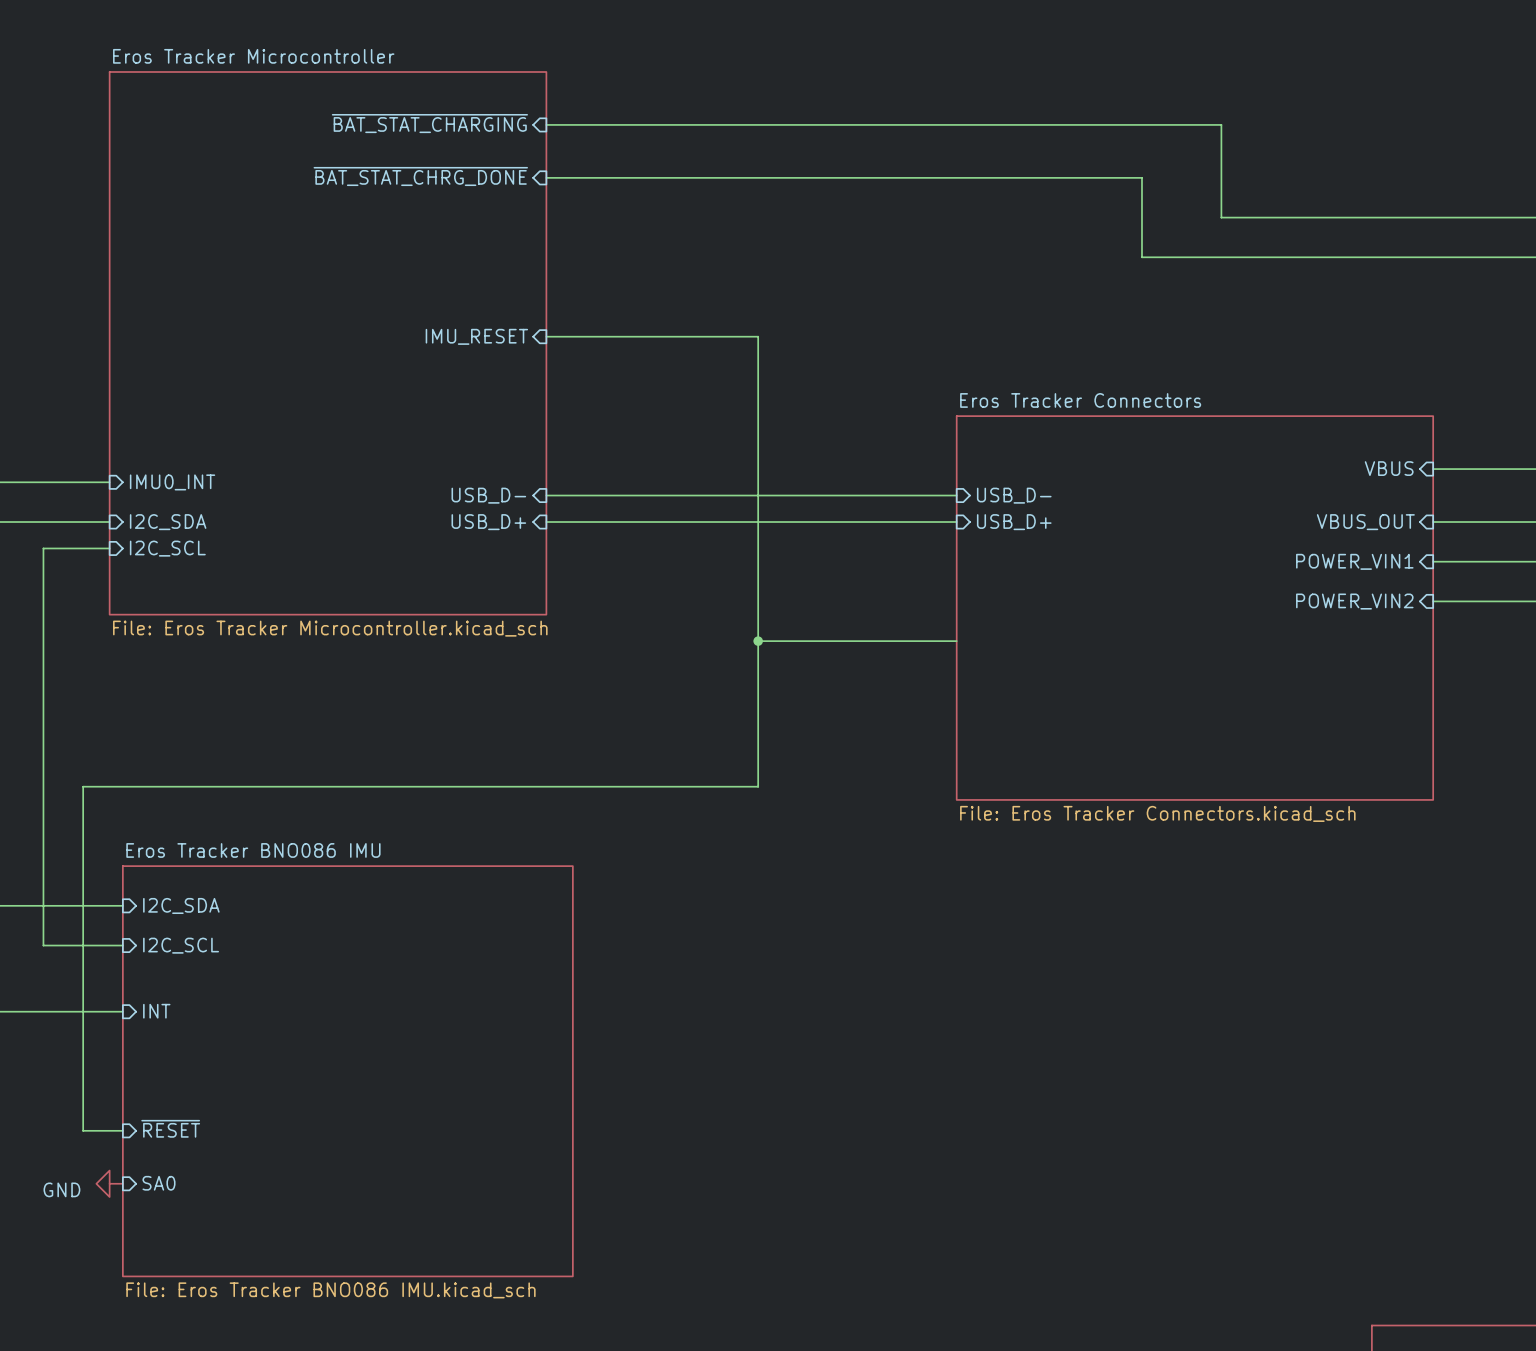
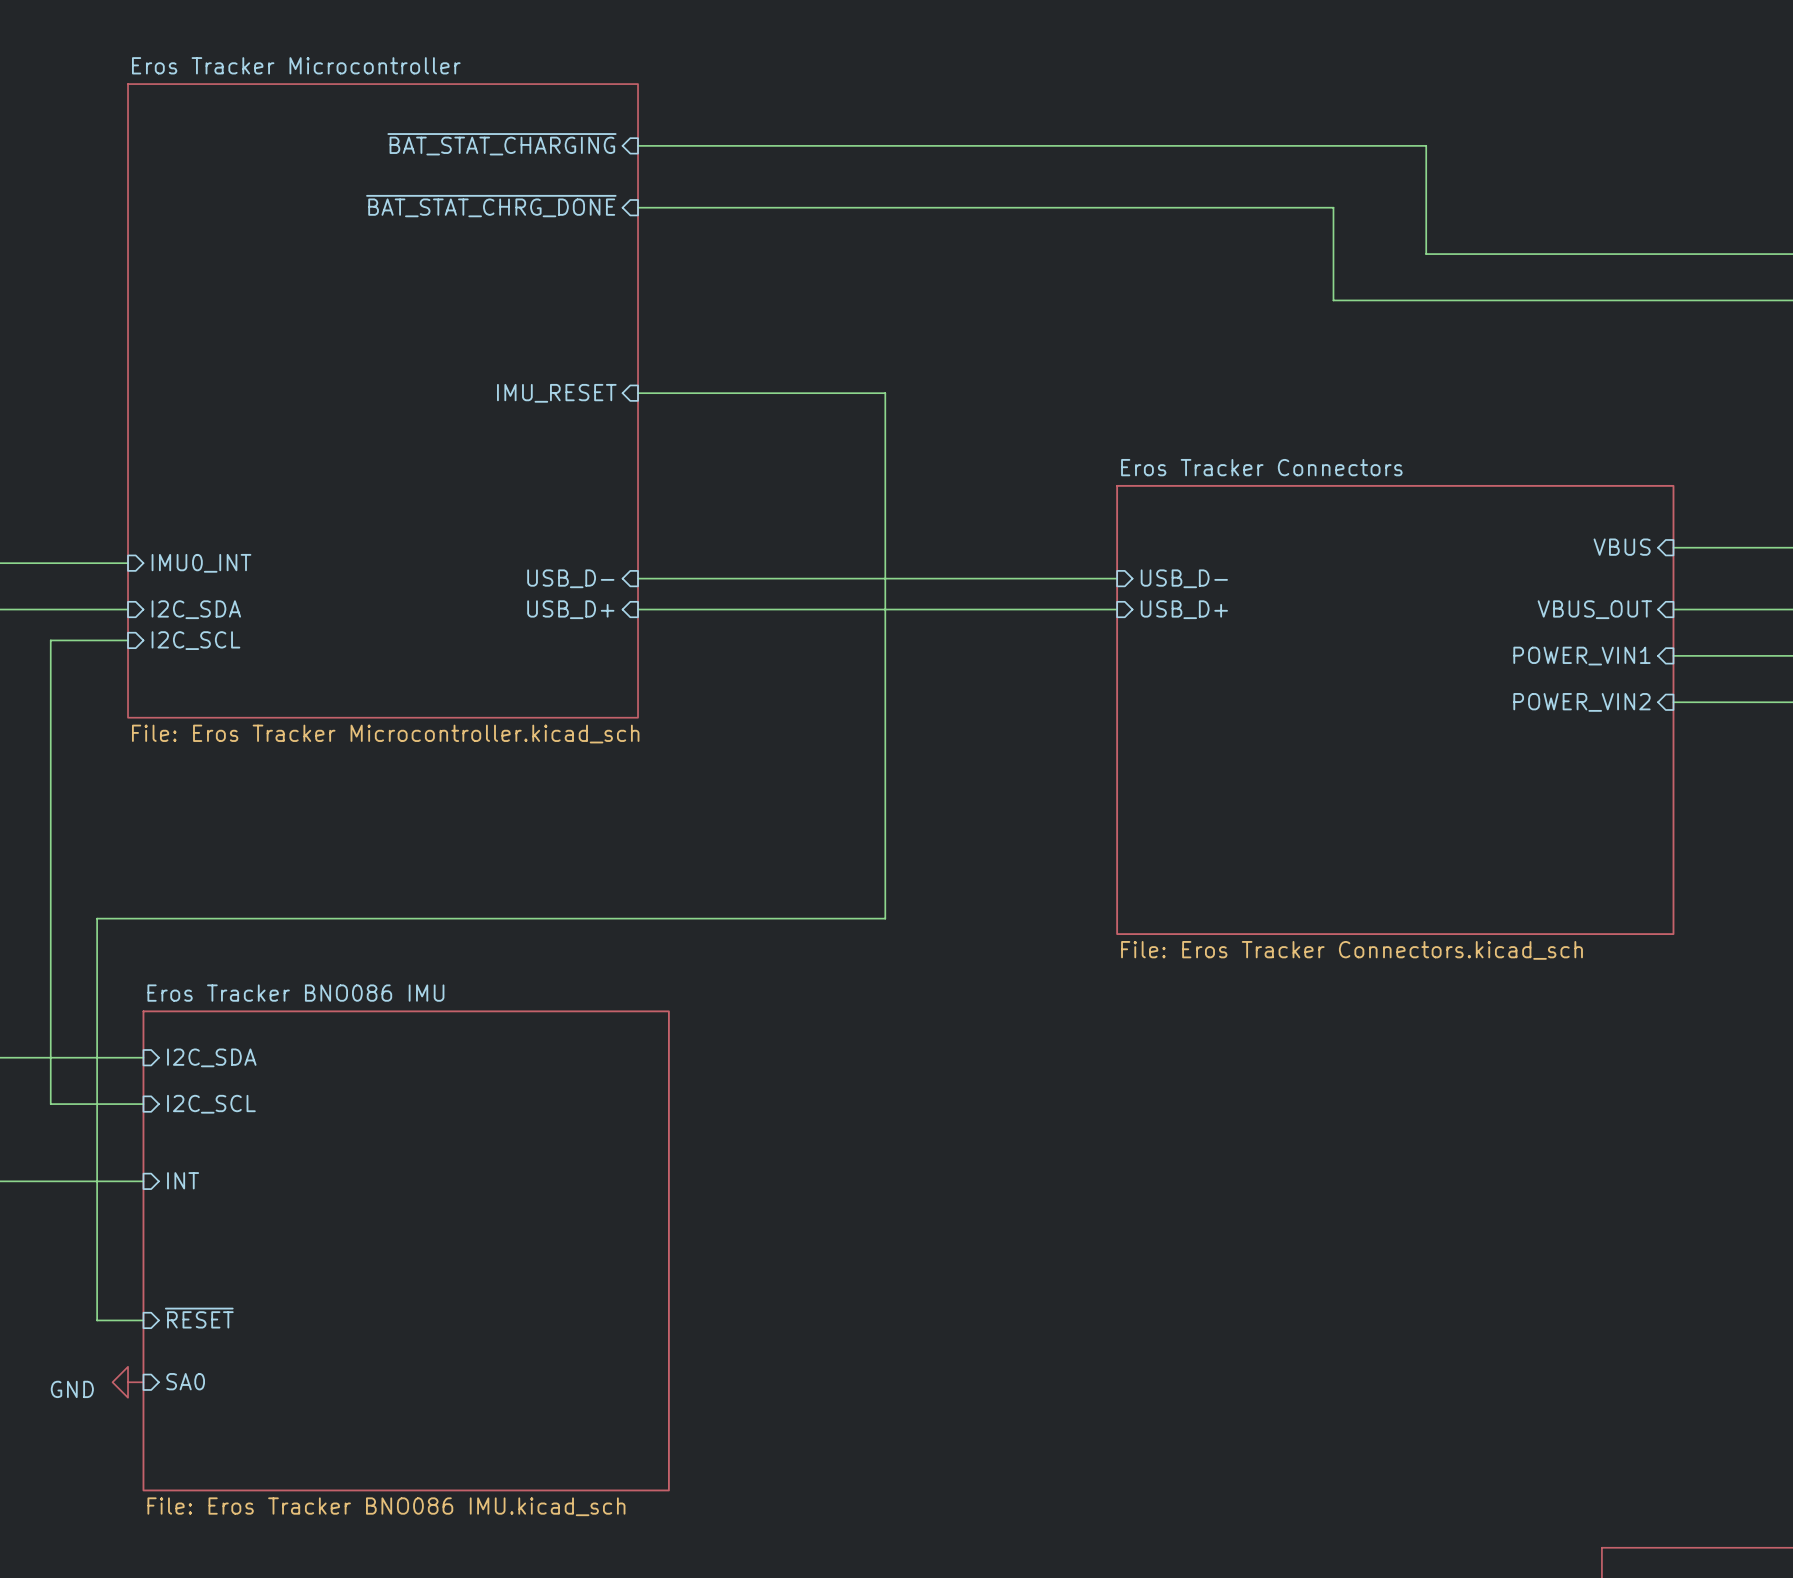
wire: (758, 641) (956, 641) -> none
junction: (758, 641) -> none

